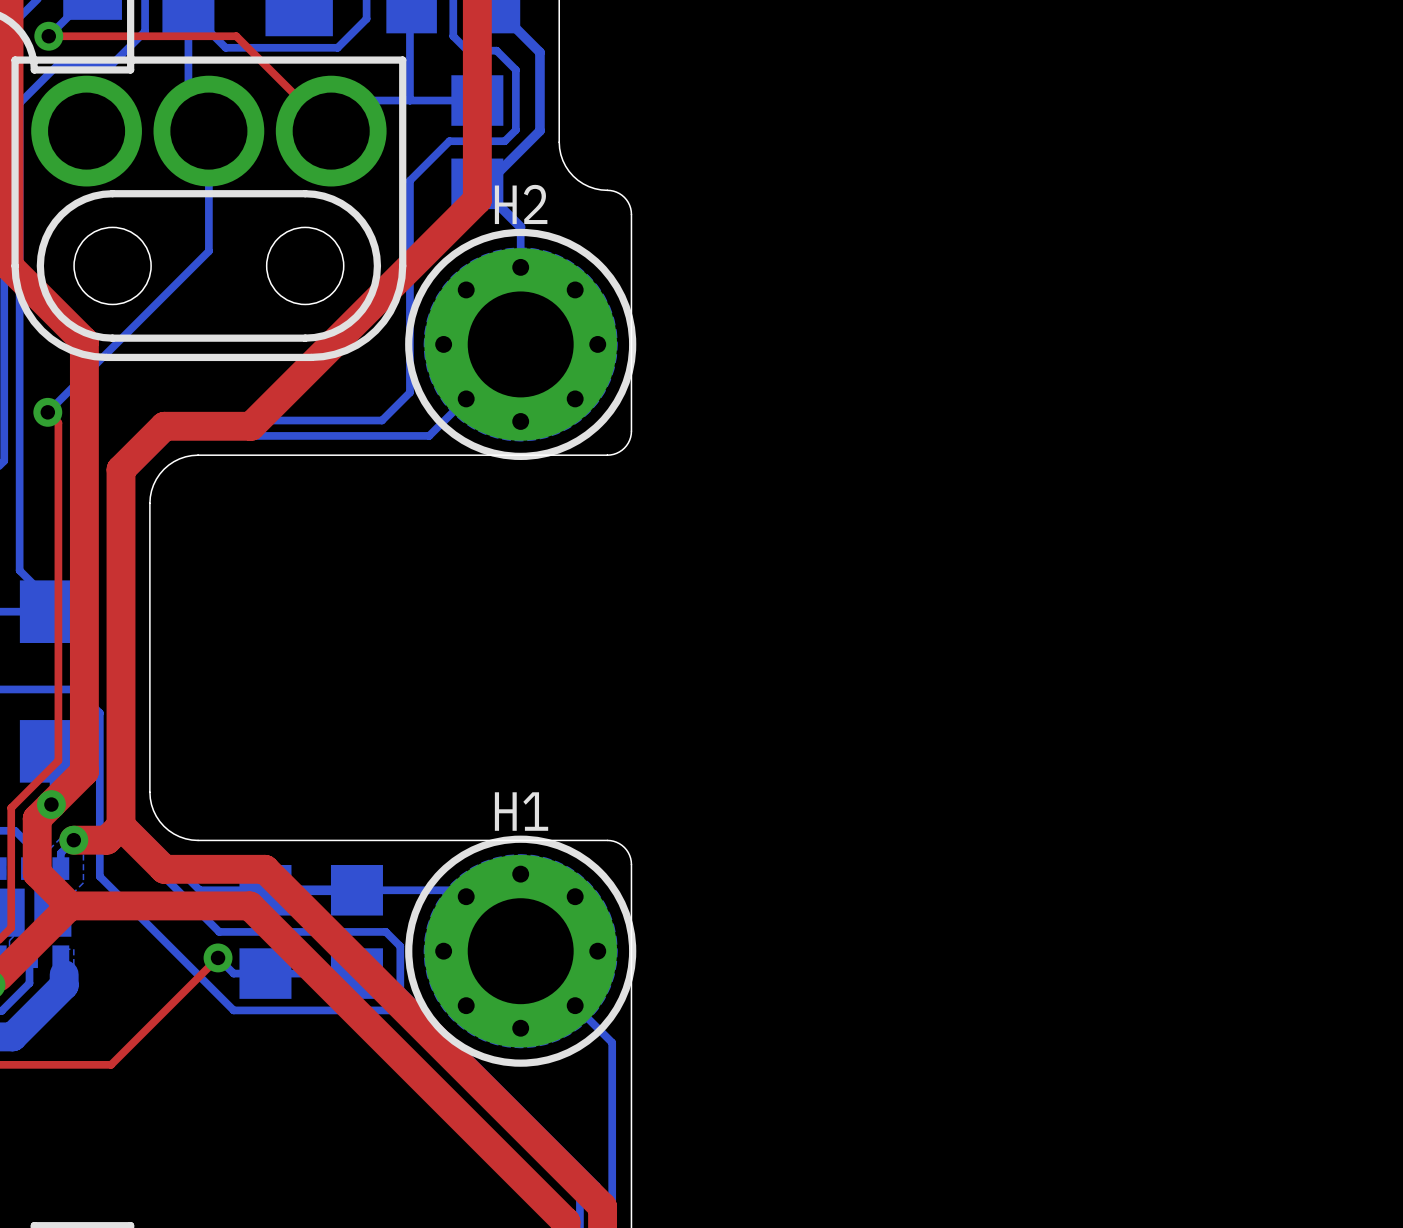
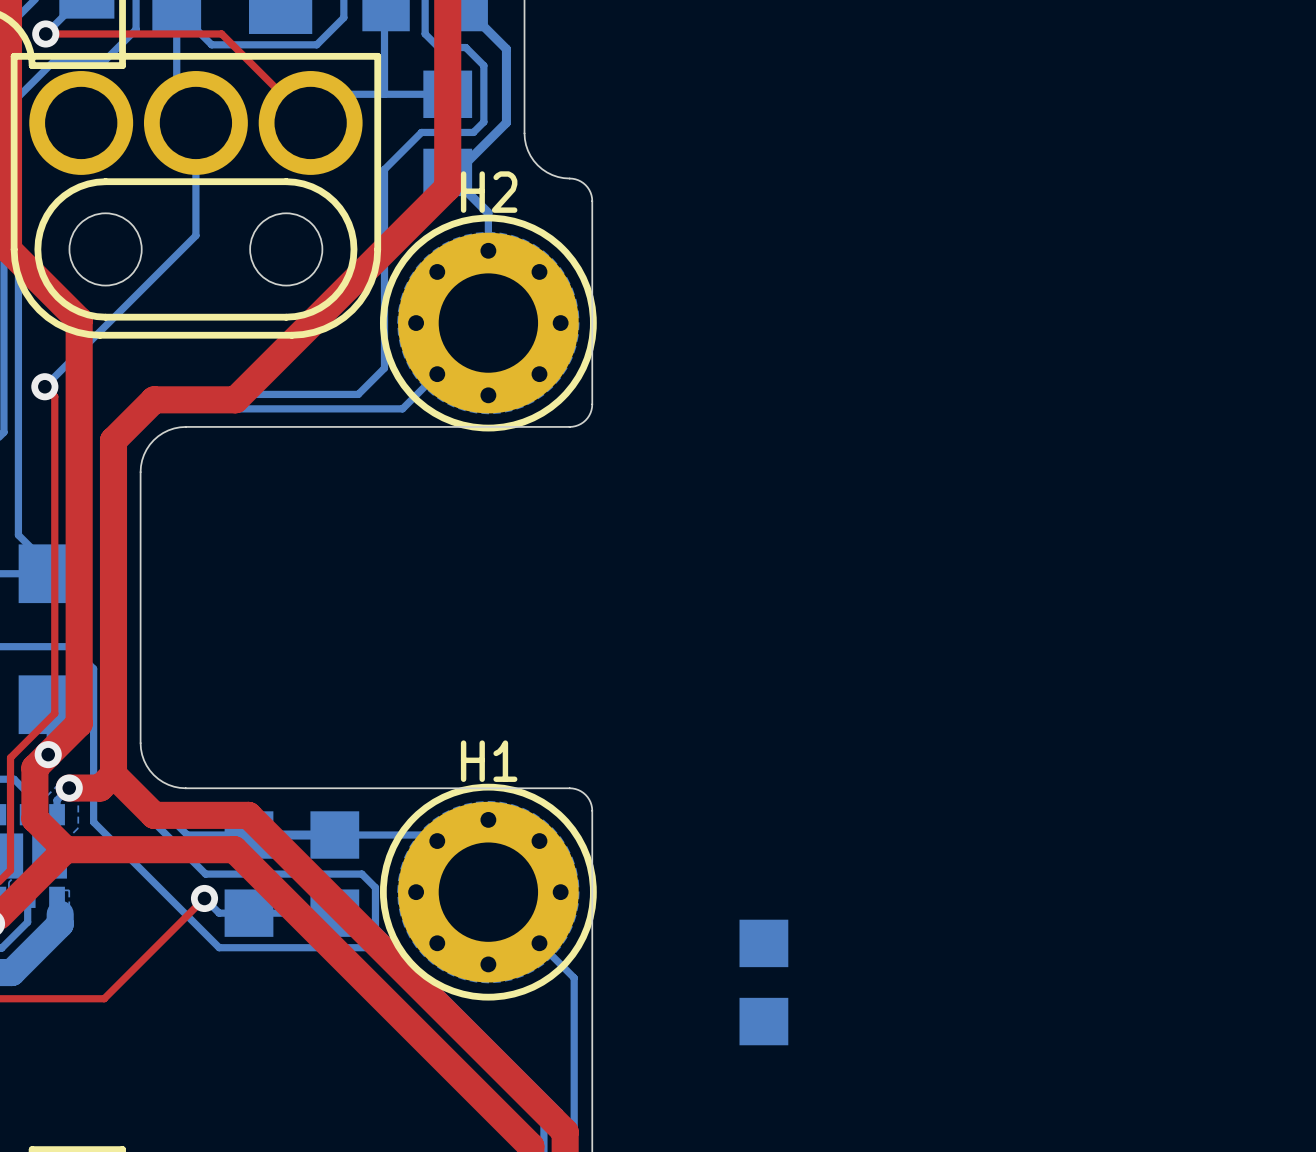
part: none -> (763, 982)

